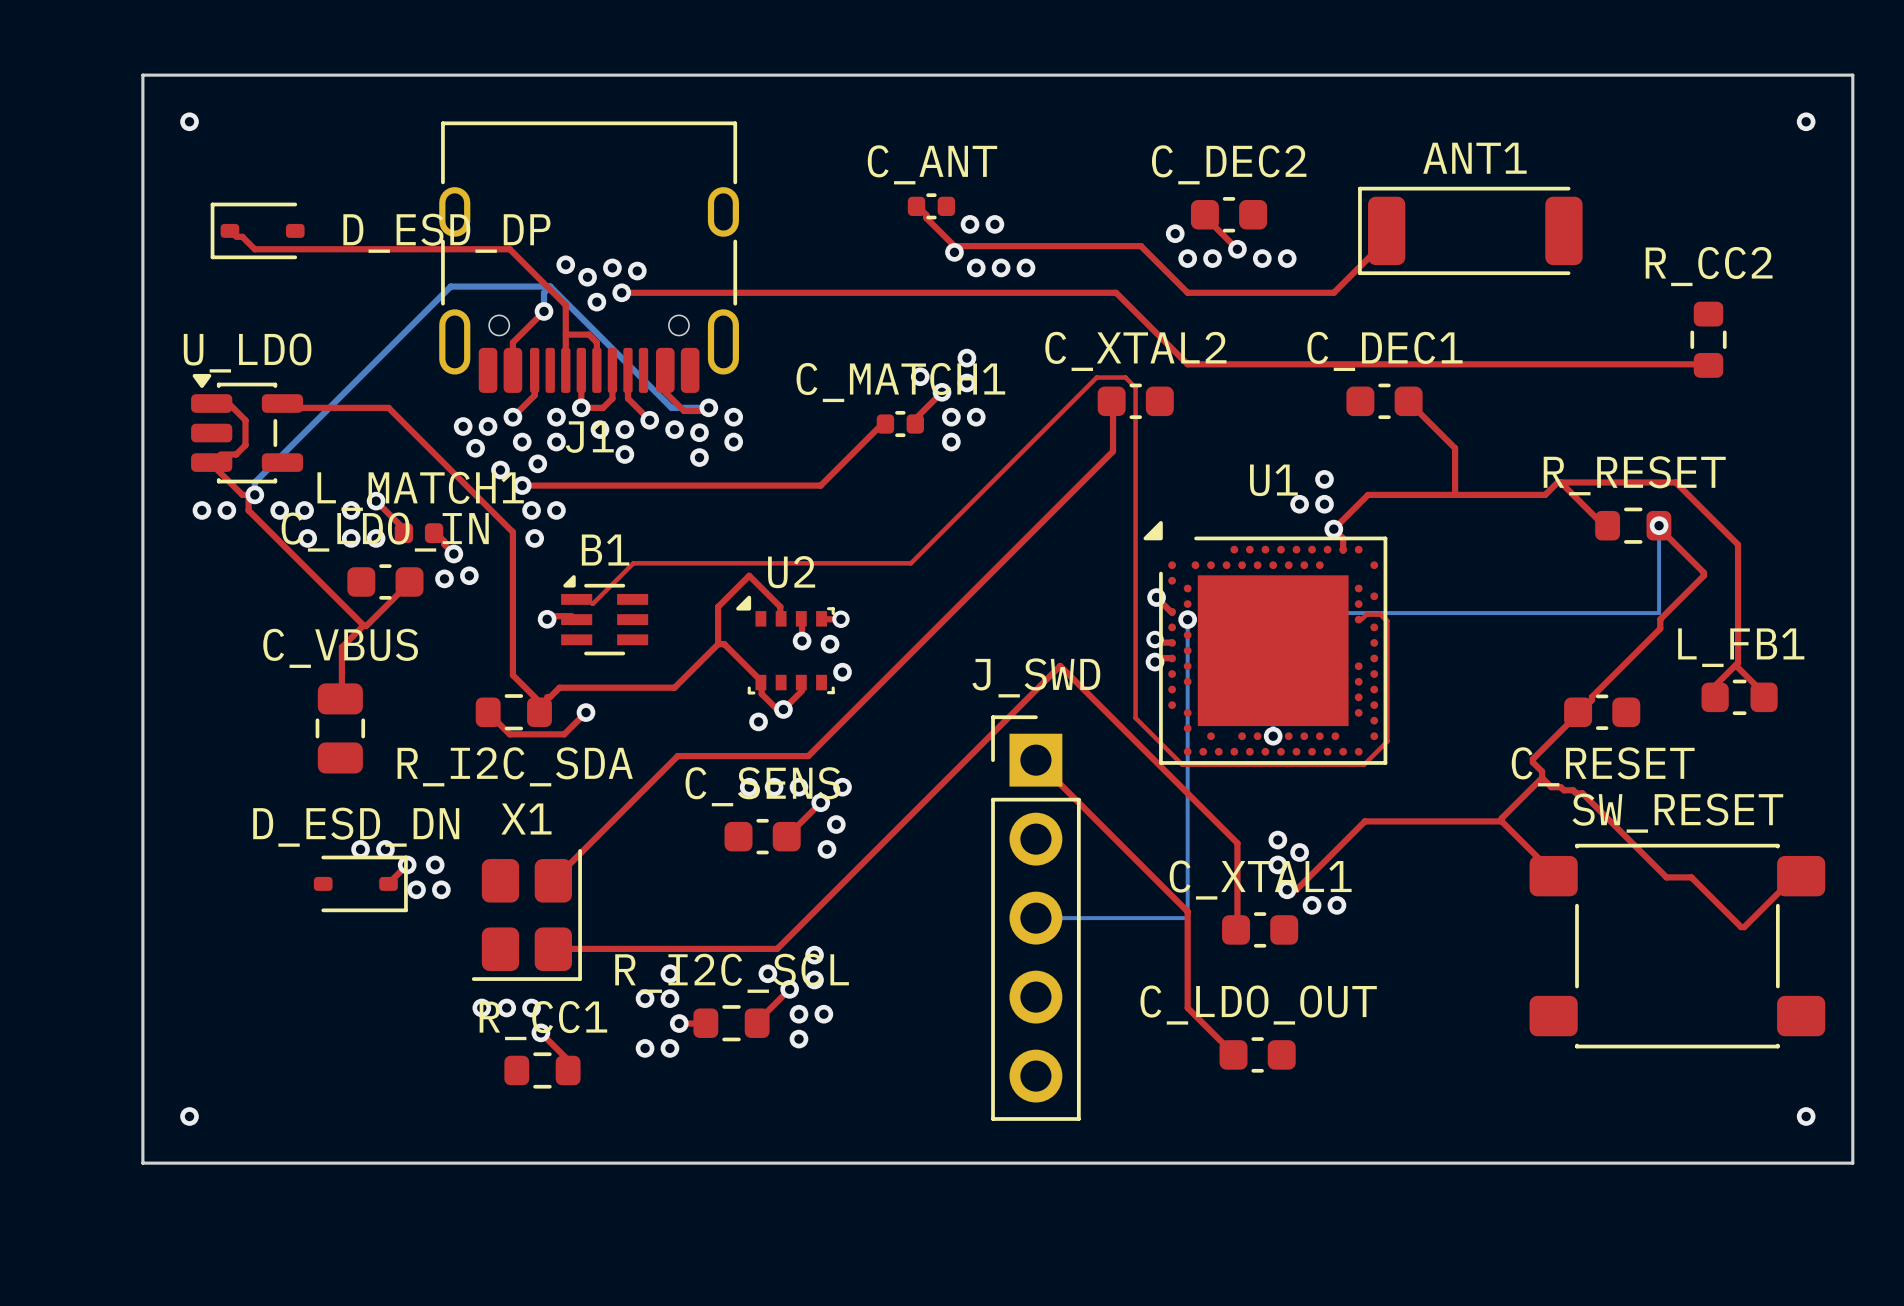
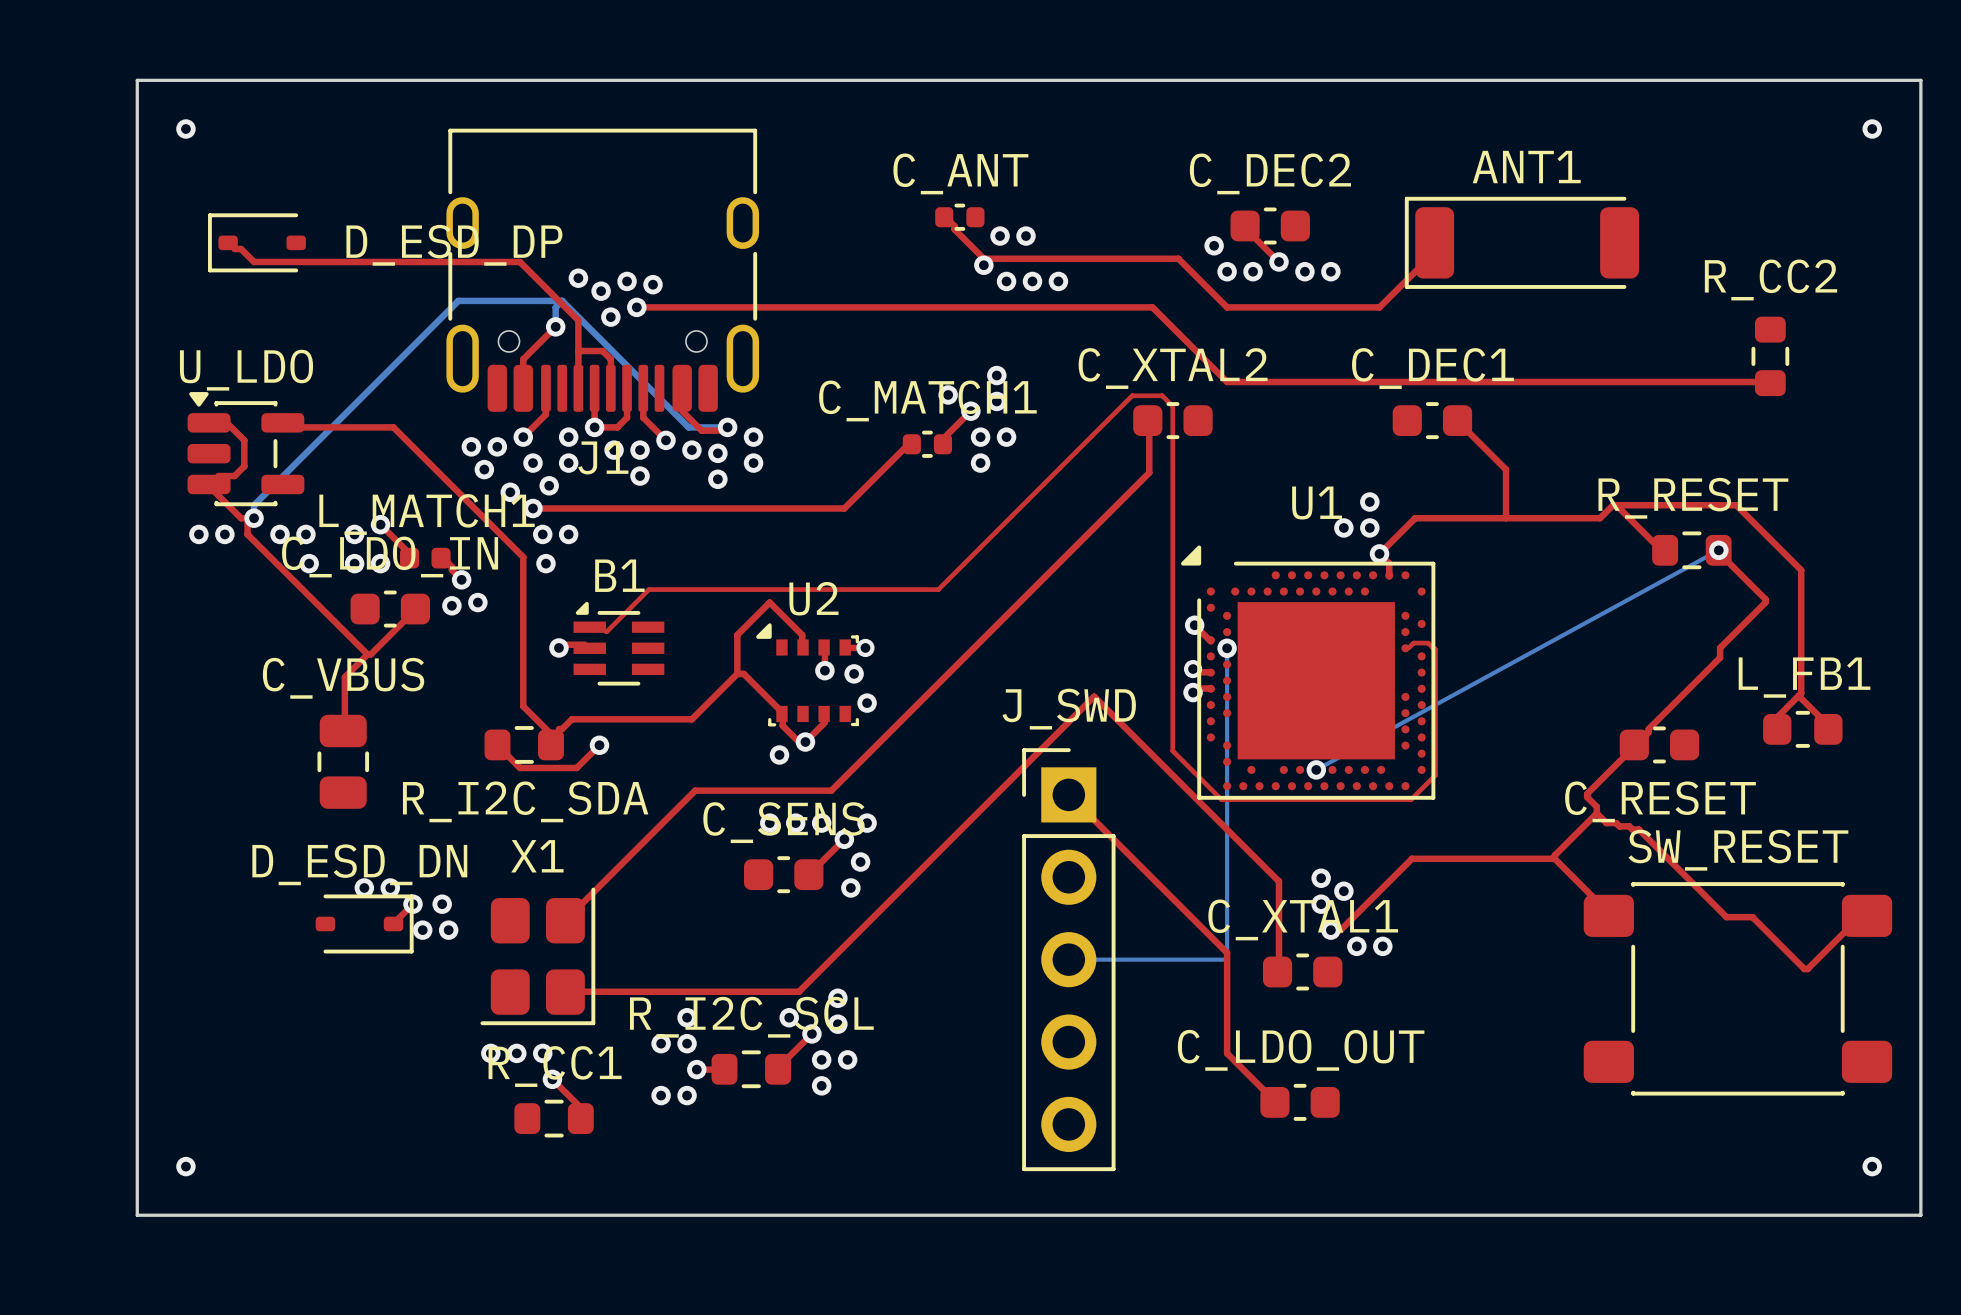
bottom track: (1659, 525) (1659, 613) (1273, 613) (1273, 736) -> (1718, 550) (1316, 769)

